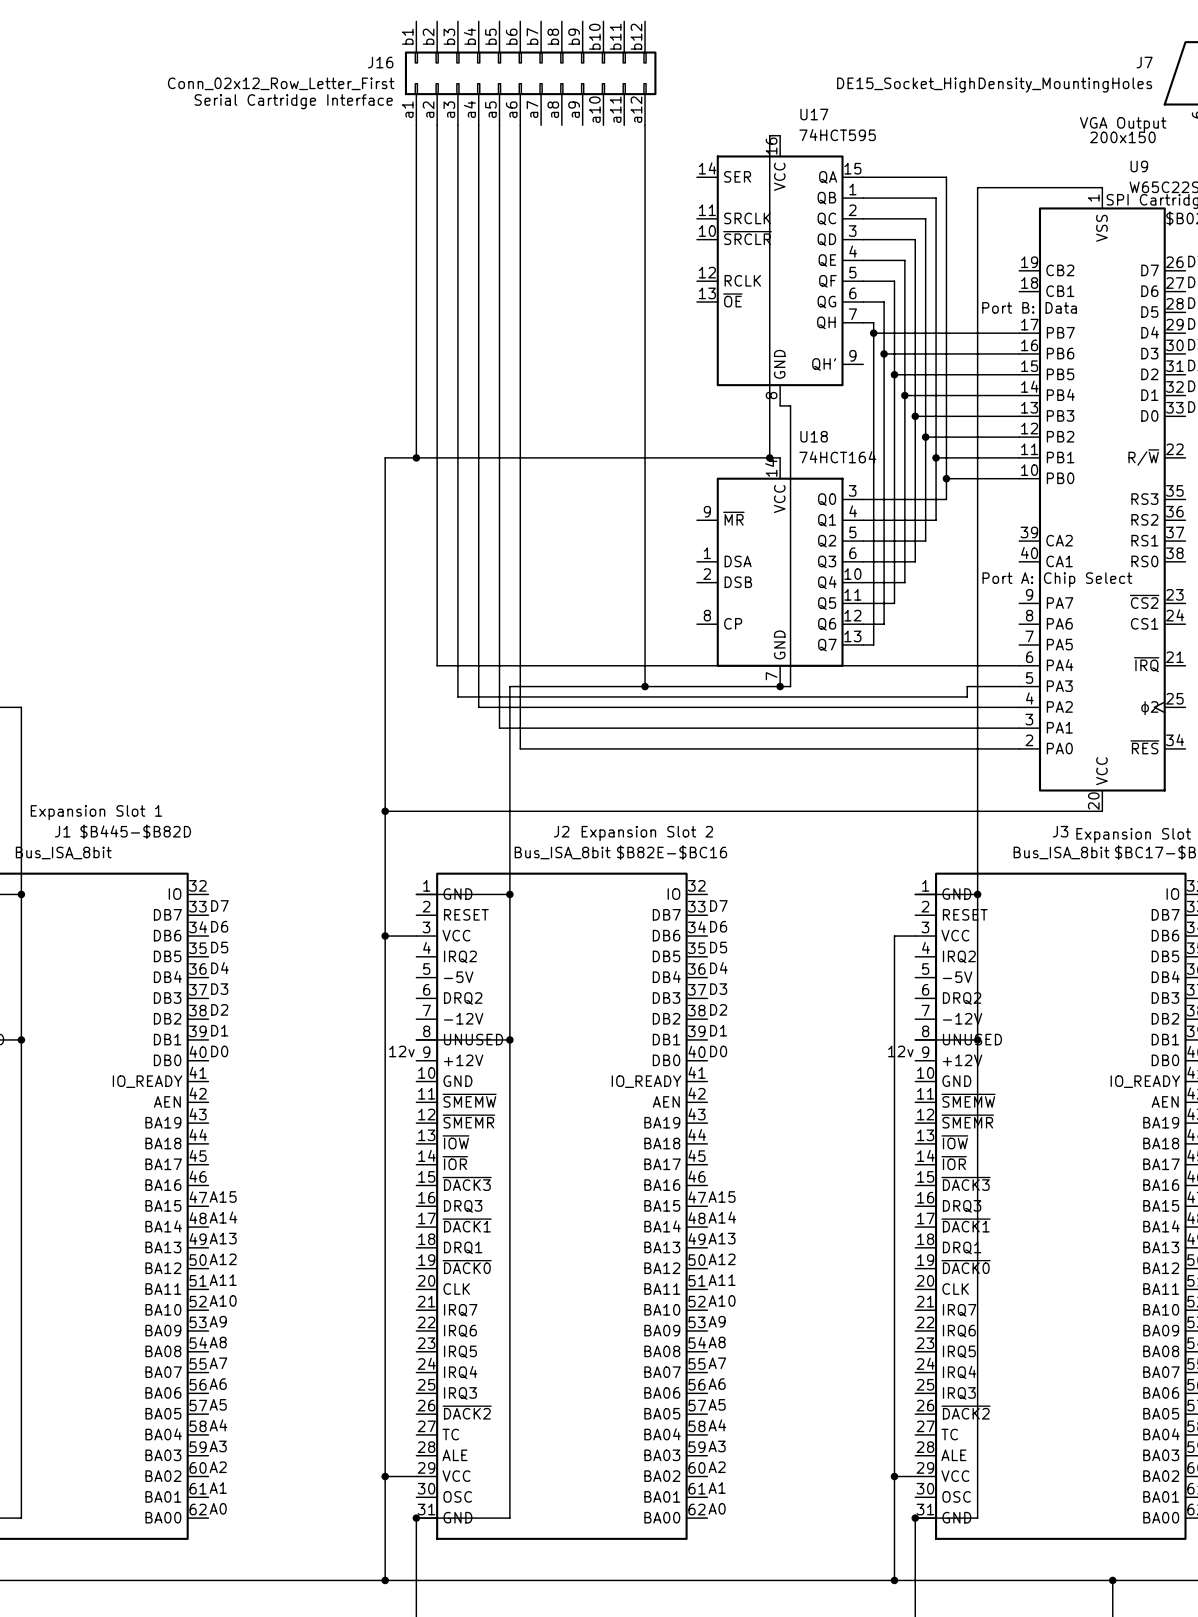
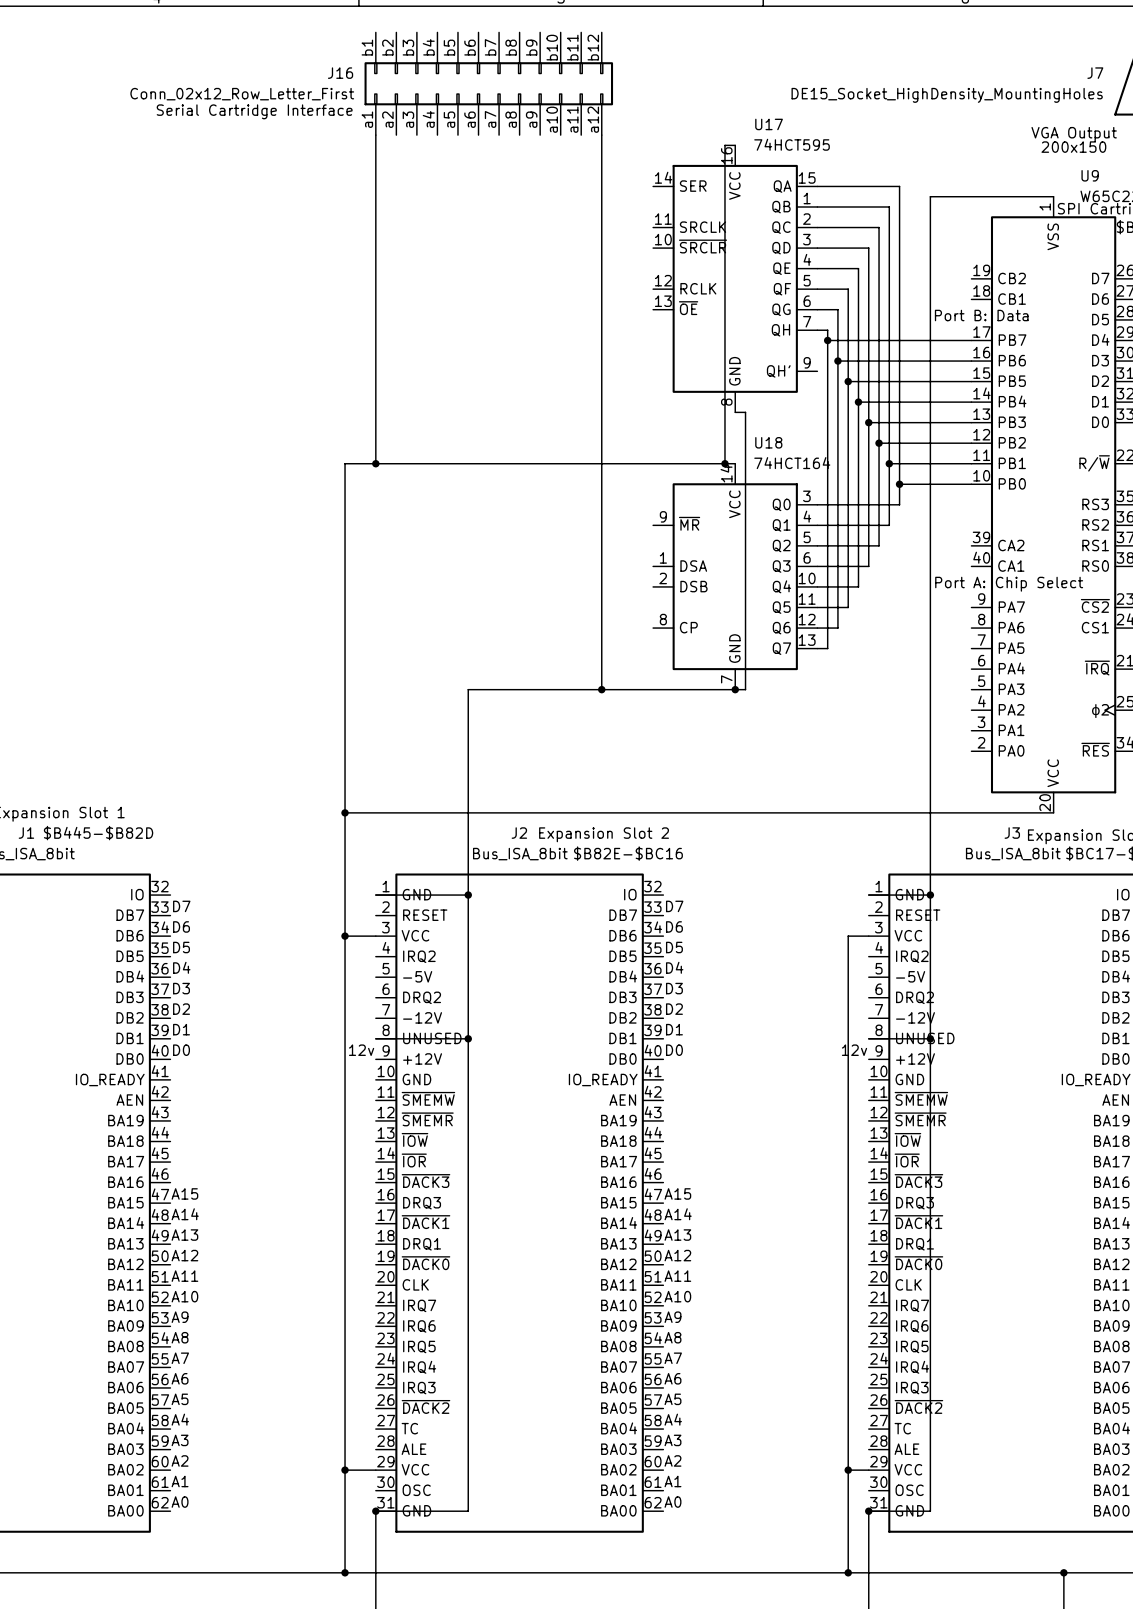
wire: (437, 125) (437, 665) (1019, 665) -> none
wire: (457, 125) (457, 696) (967, 696) (967, 686) (1019, 686) -> none
wire: (478, 125) (478, 707) (1019, 707) -> none
wire: (499, 125) (499, 728) (1019, 728) -> none
wire: (520, 125) (520, 748) (1019, 748) -> none

